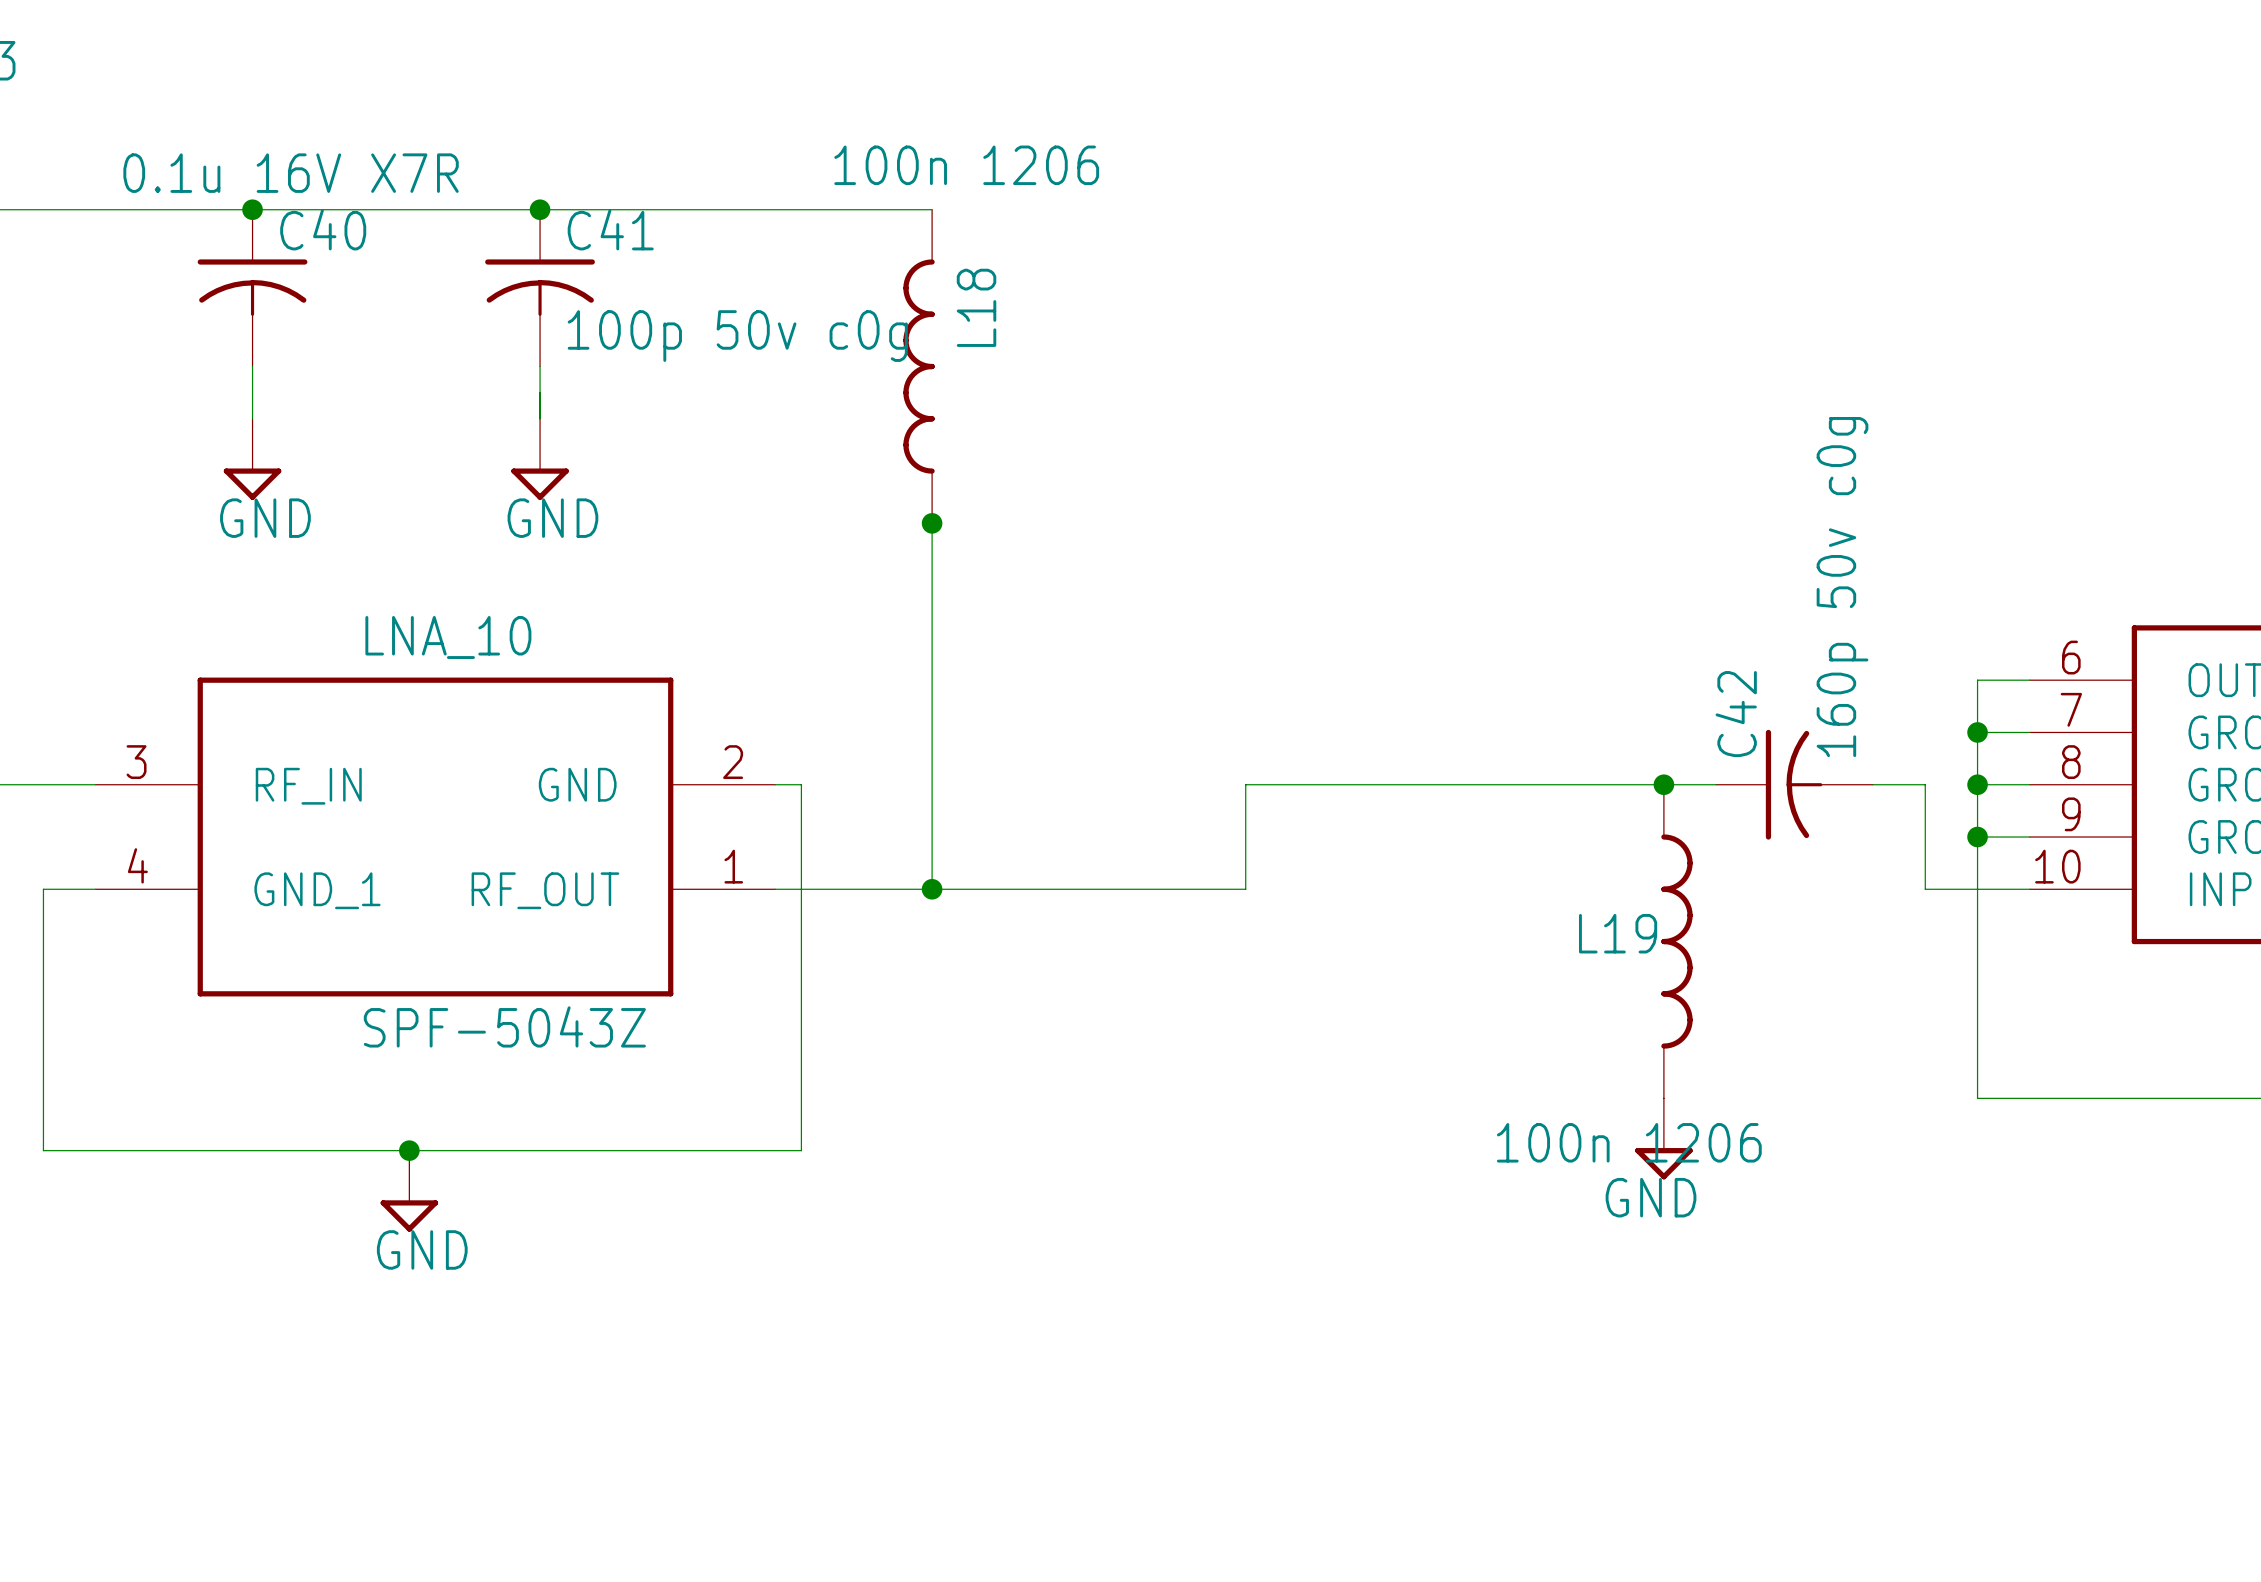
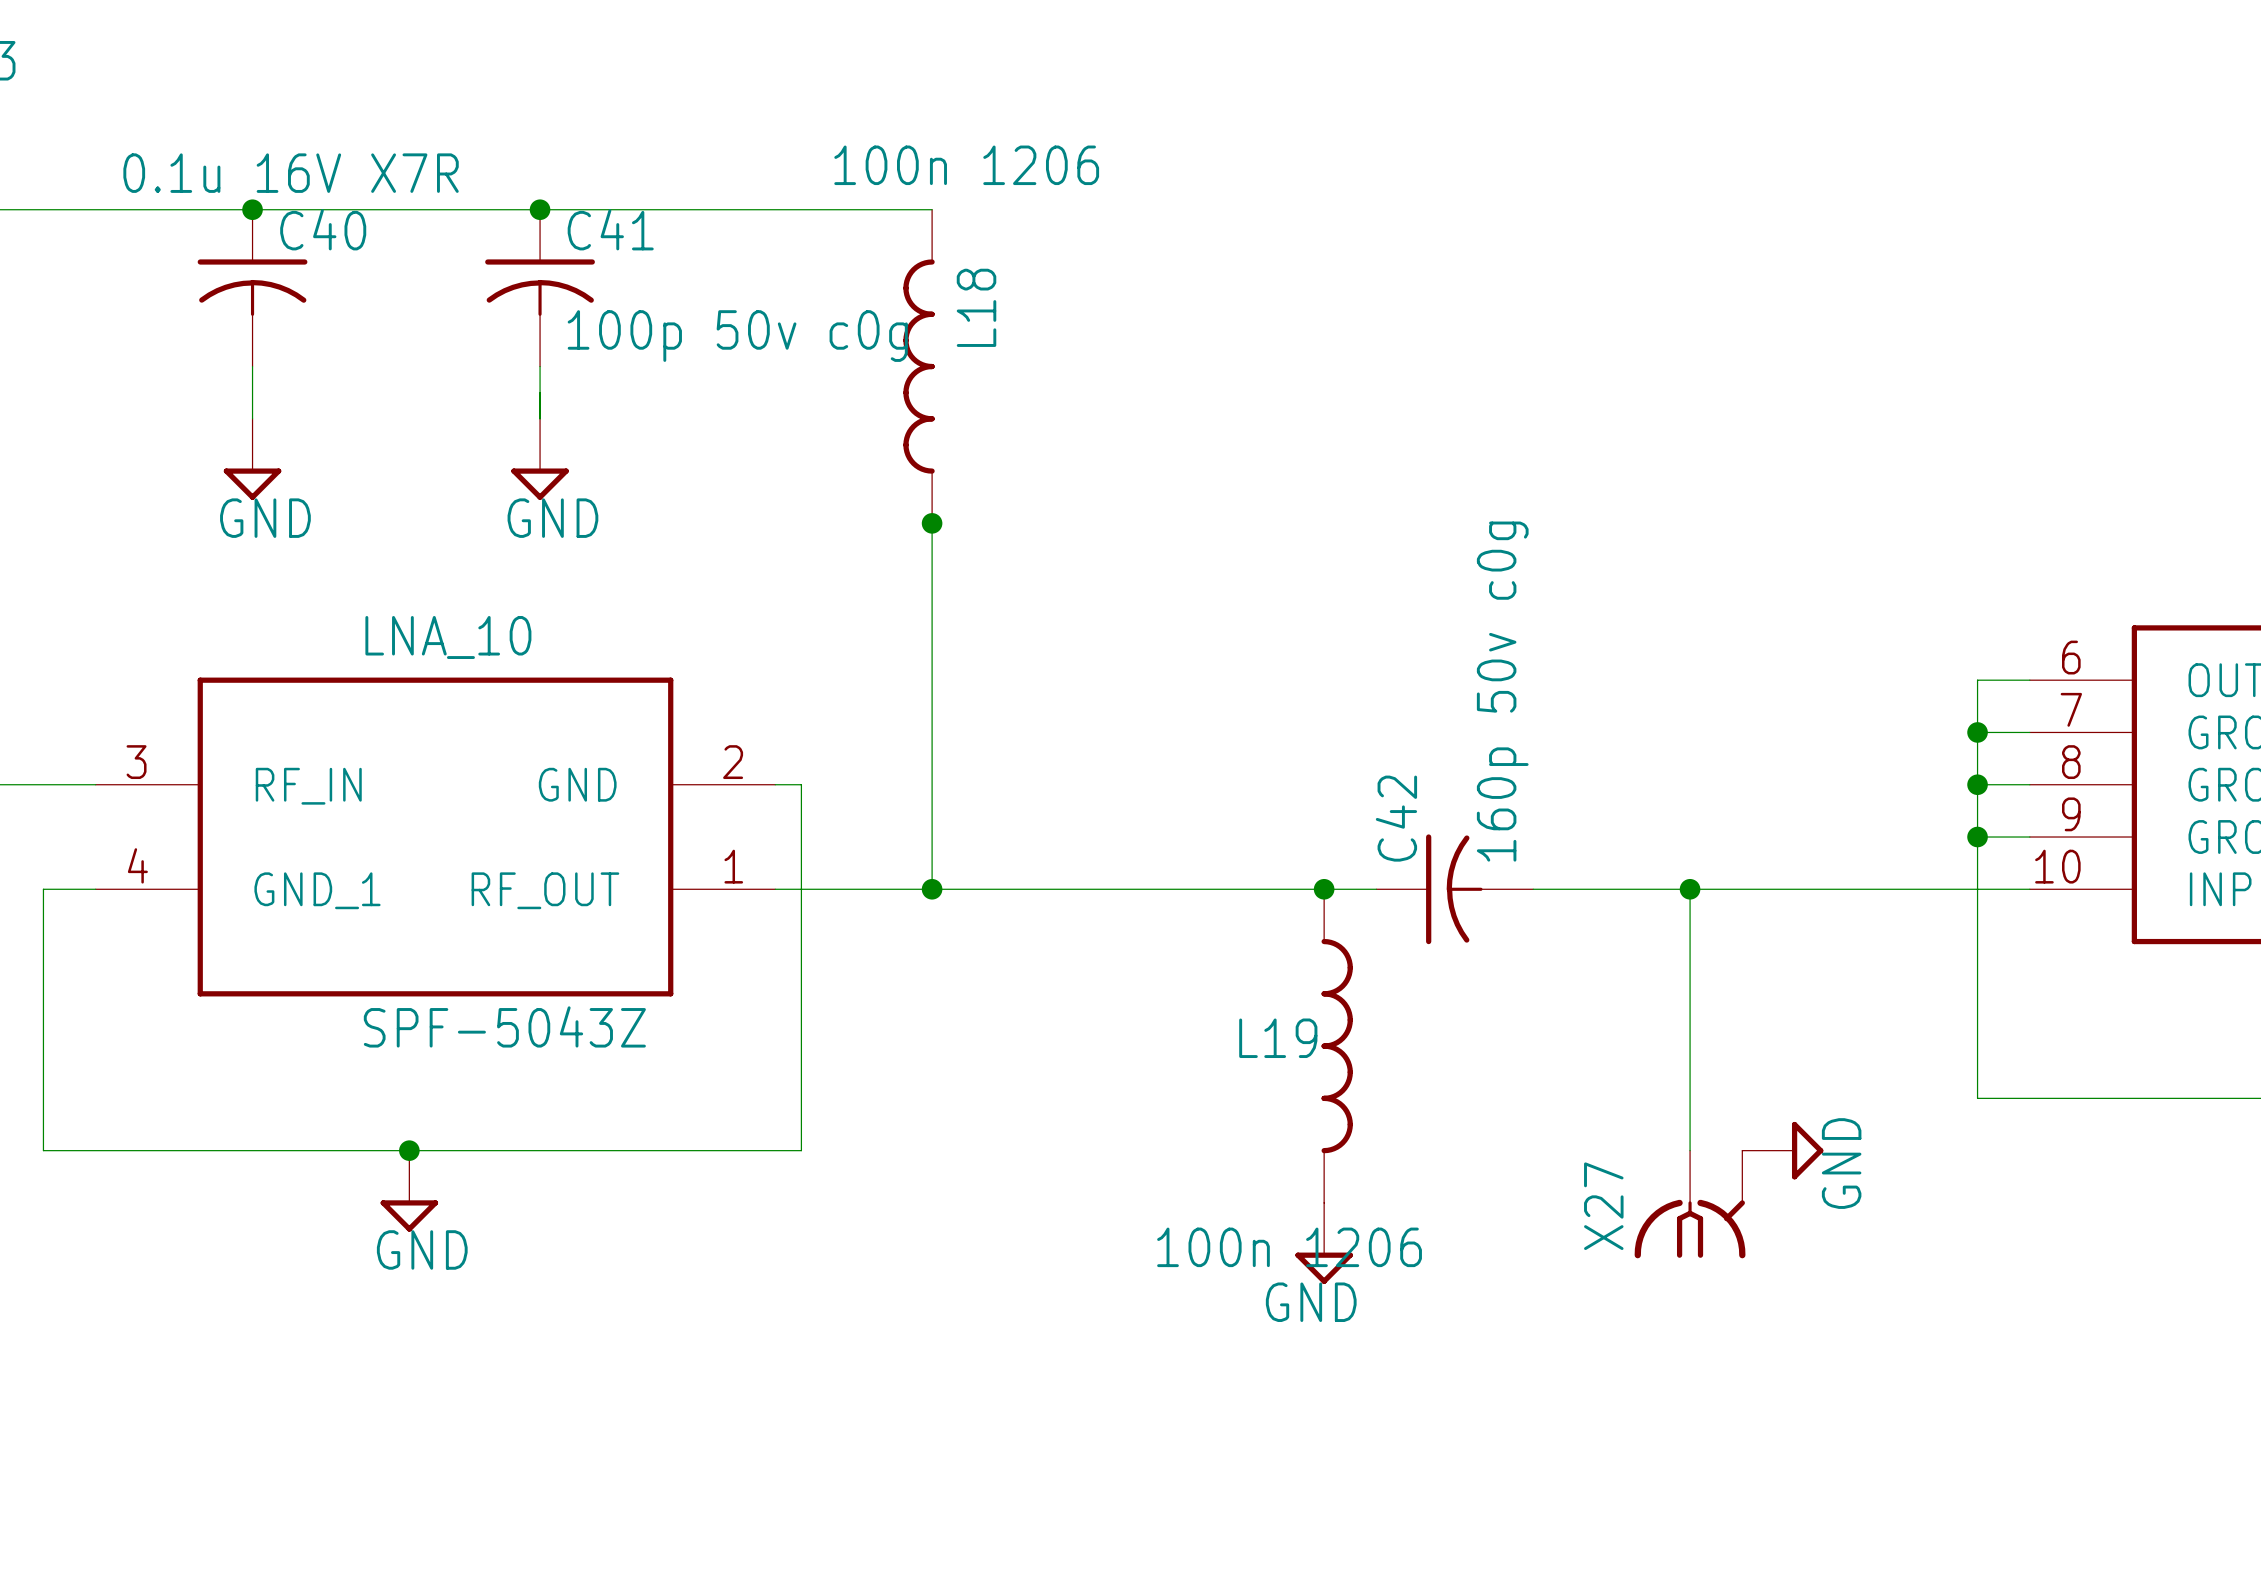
junction position: (1663, 784) -> (1690, 889)
wire: (1716, 784) (1245, 784) (1245, 889) -> (1376, 889) (1245, 889)
C42 position: (1794, 784) -> (1454, 889)
wire: (1873, 784) (1925, 784) (1925, 889) -> (1533, 889) (1925, 889)
junction: none -> (1324, 889)
wire: none -> (1690, 889) (1690, 1150)
L19 position: (1676, 941) -> (1337, 1046)
power symbol position: GND (1663, 1138) -> GND (1782, 1150)
power symbol rotation: 0° (1663, 1163) -> 90° counterclockwise (1807, 1150)
X27: none -> (1690, 1204)
power symbol: none -> GND (1324, 1243)

